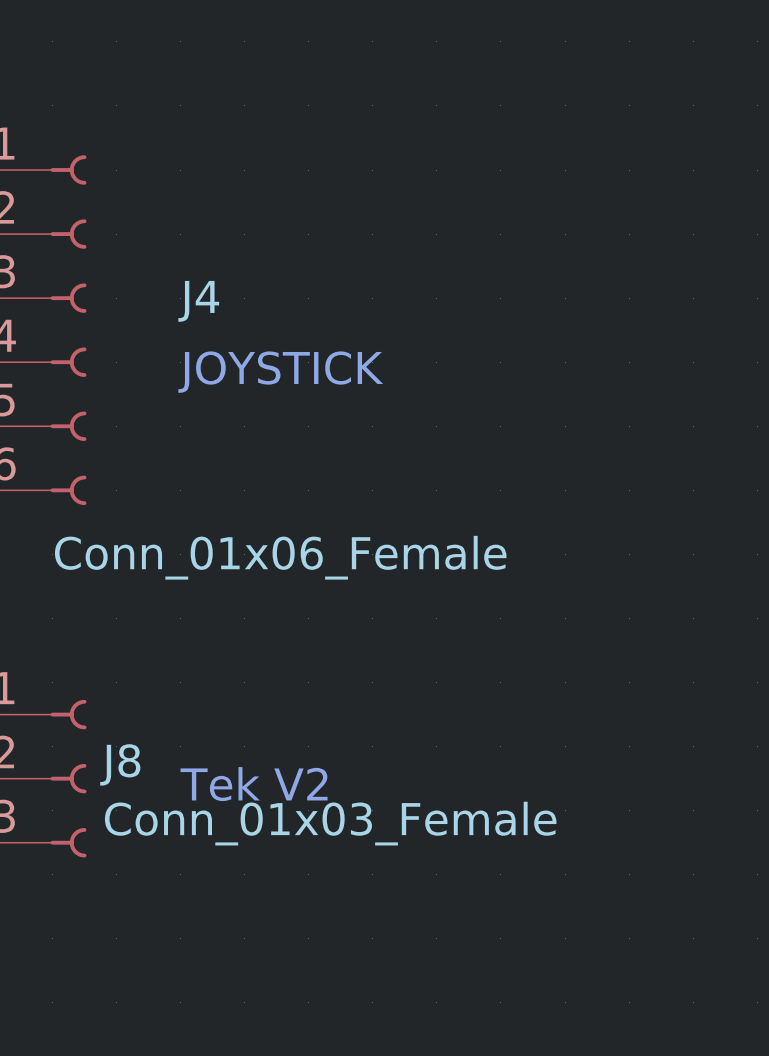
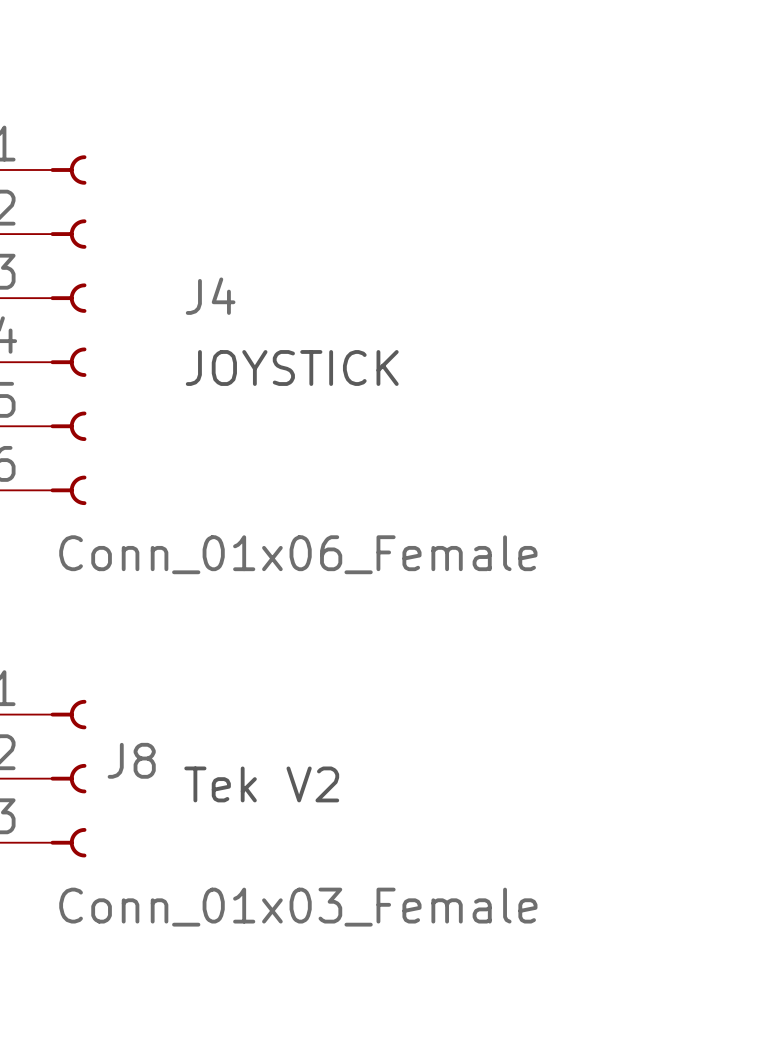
J8 value position: Conn_01x03_Female (330, 823) -> Conn_01x03_Female (298, 907)

